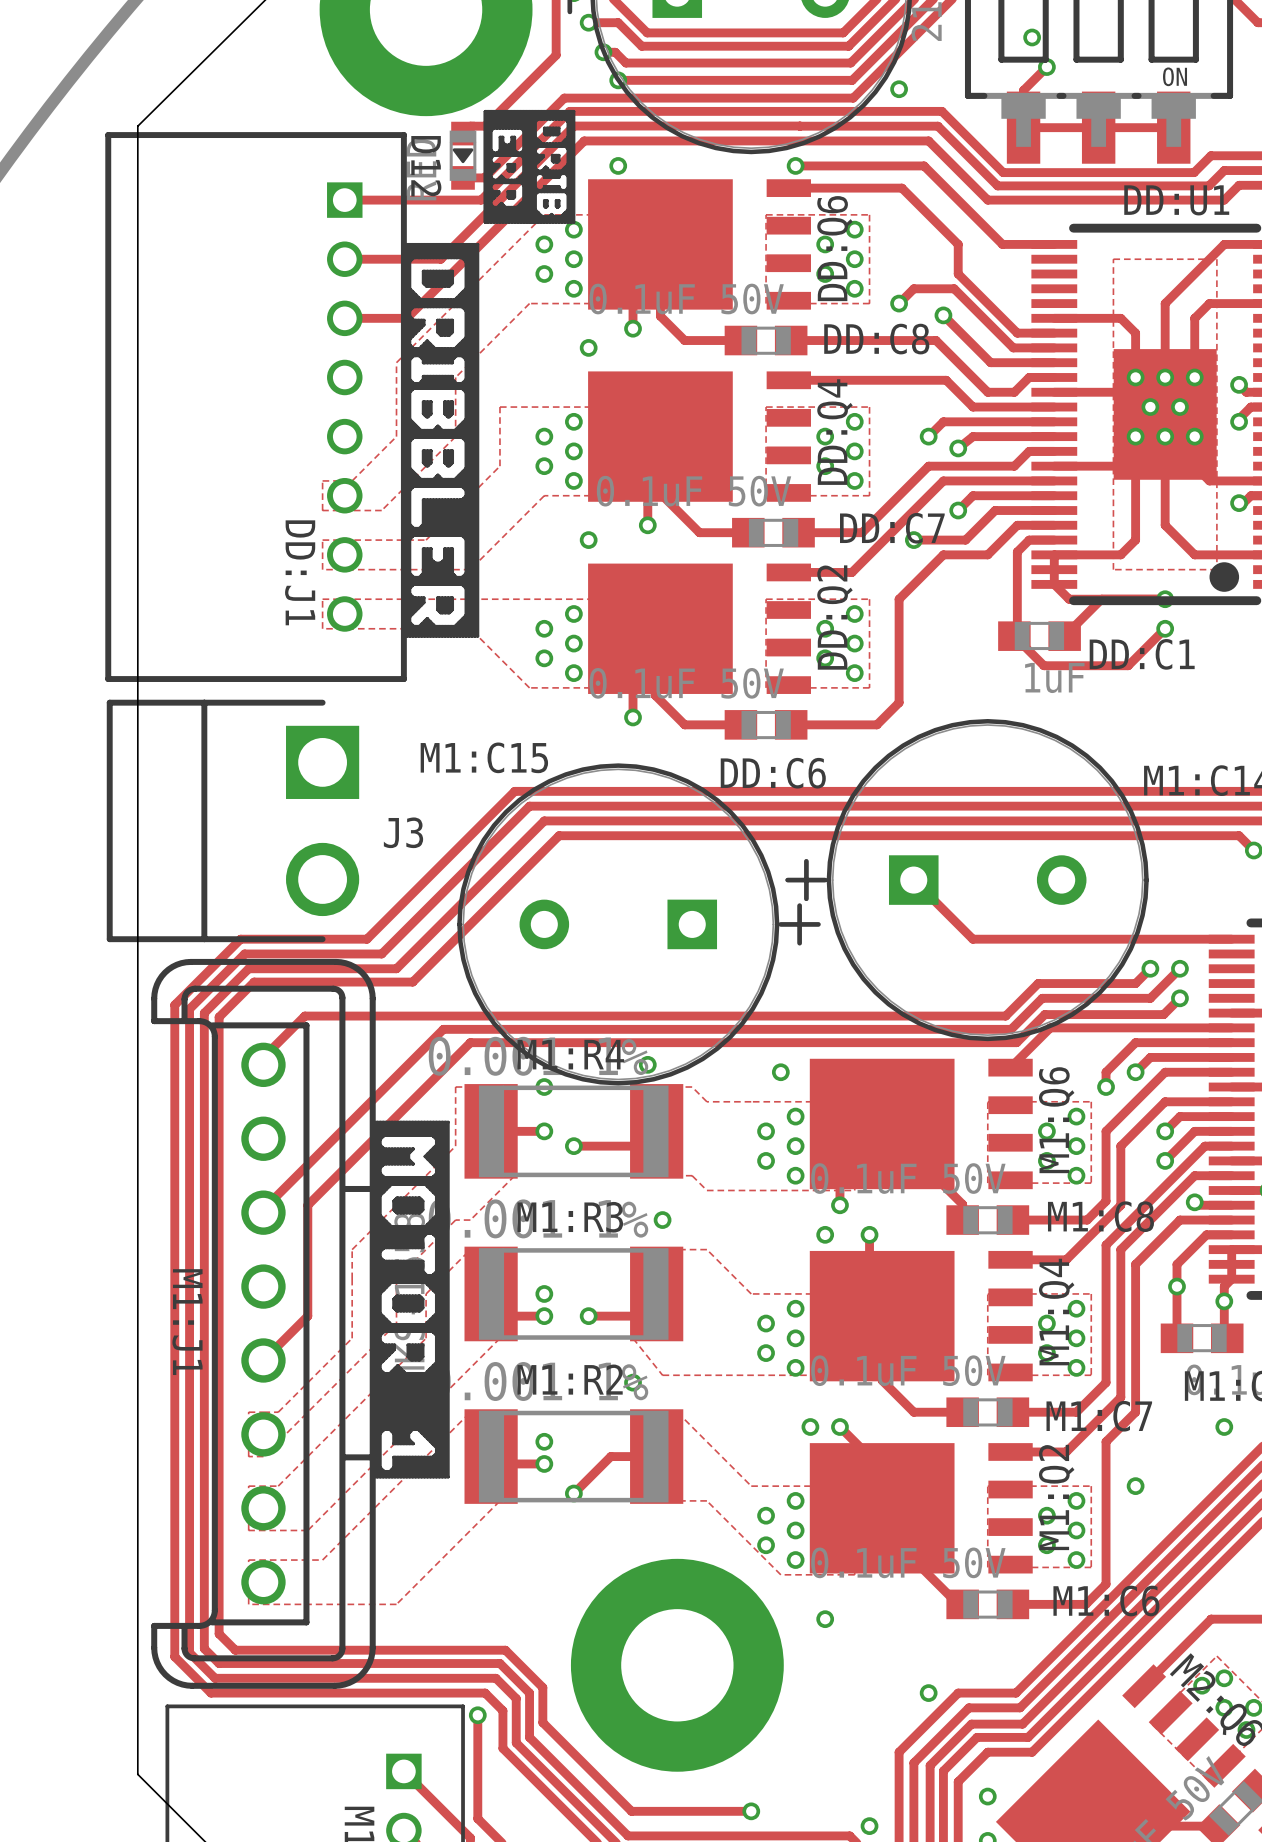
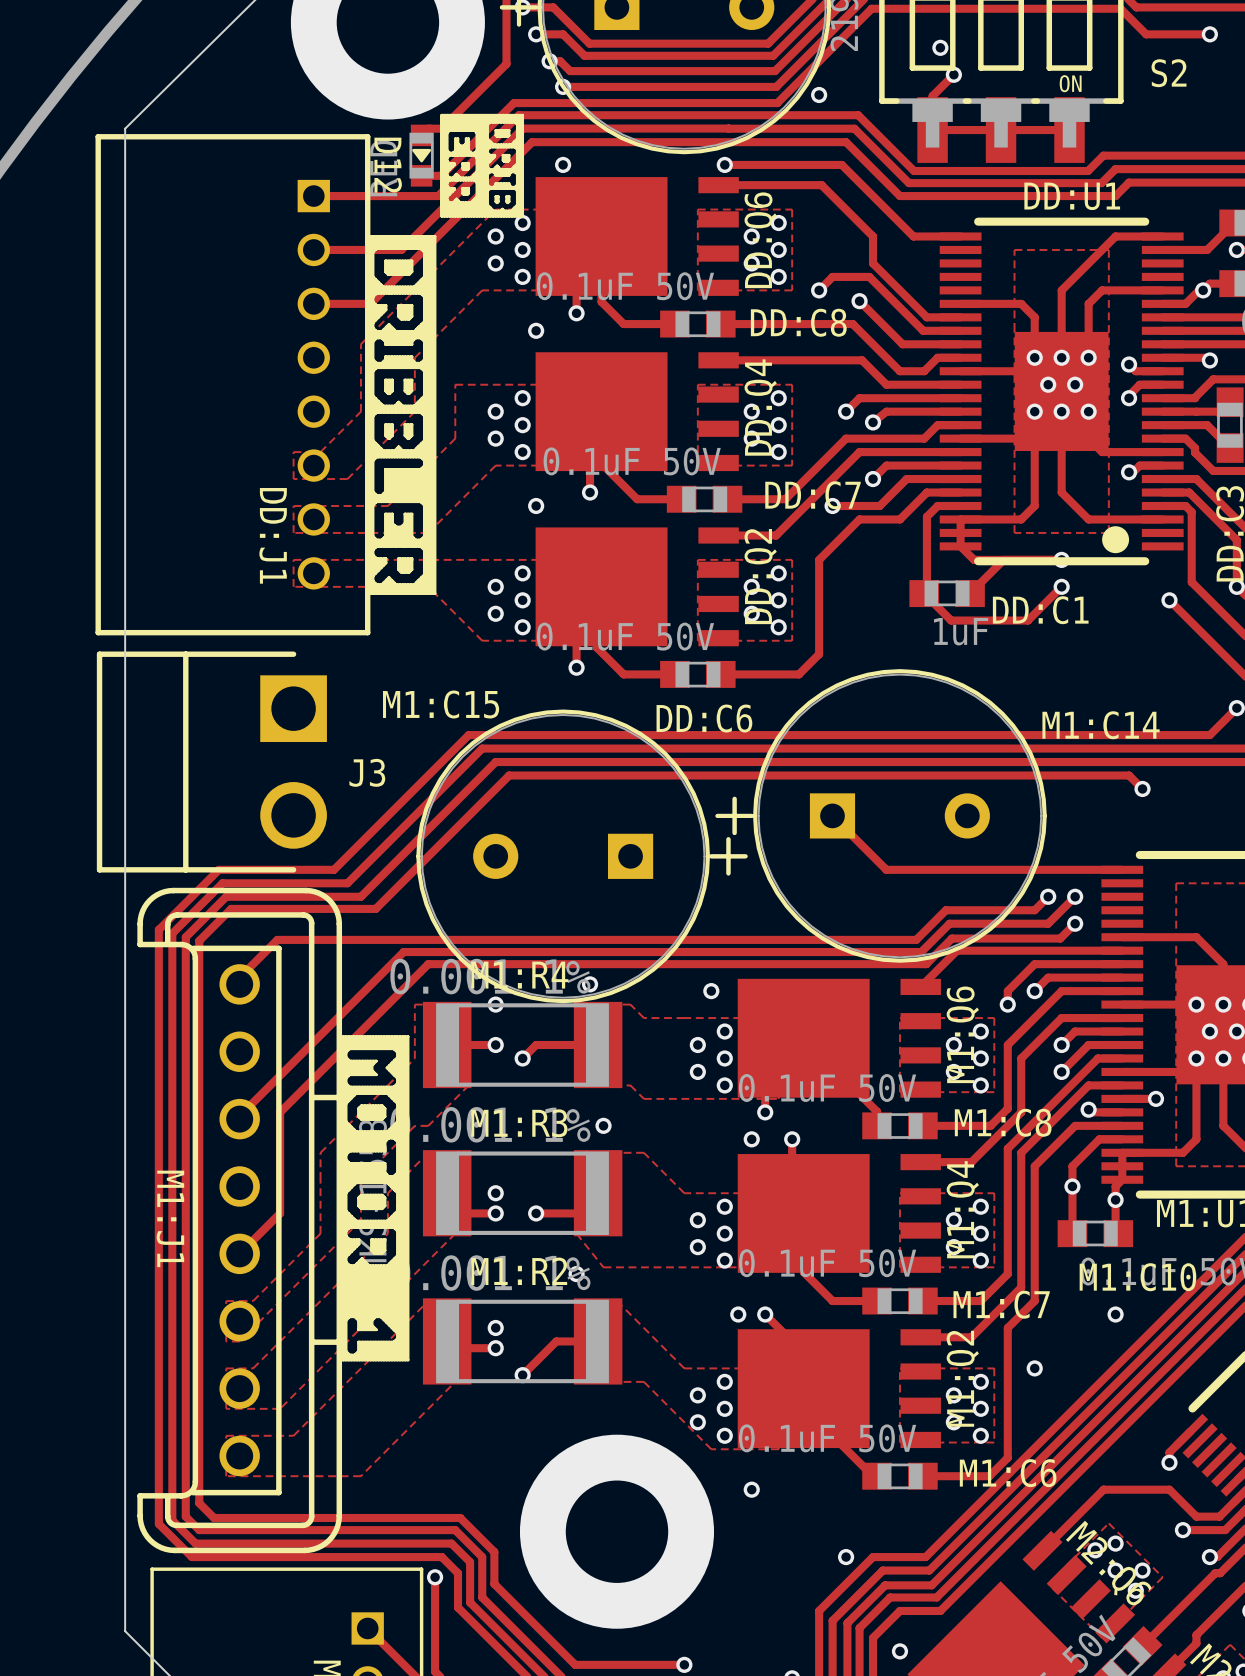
track: (573, 1146) (647, 1146) -> (522, 1058) (536, 1045) (598, 1045)

